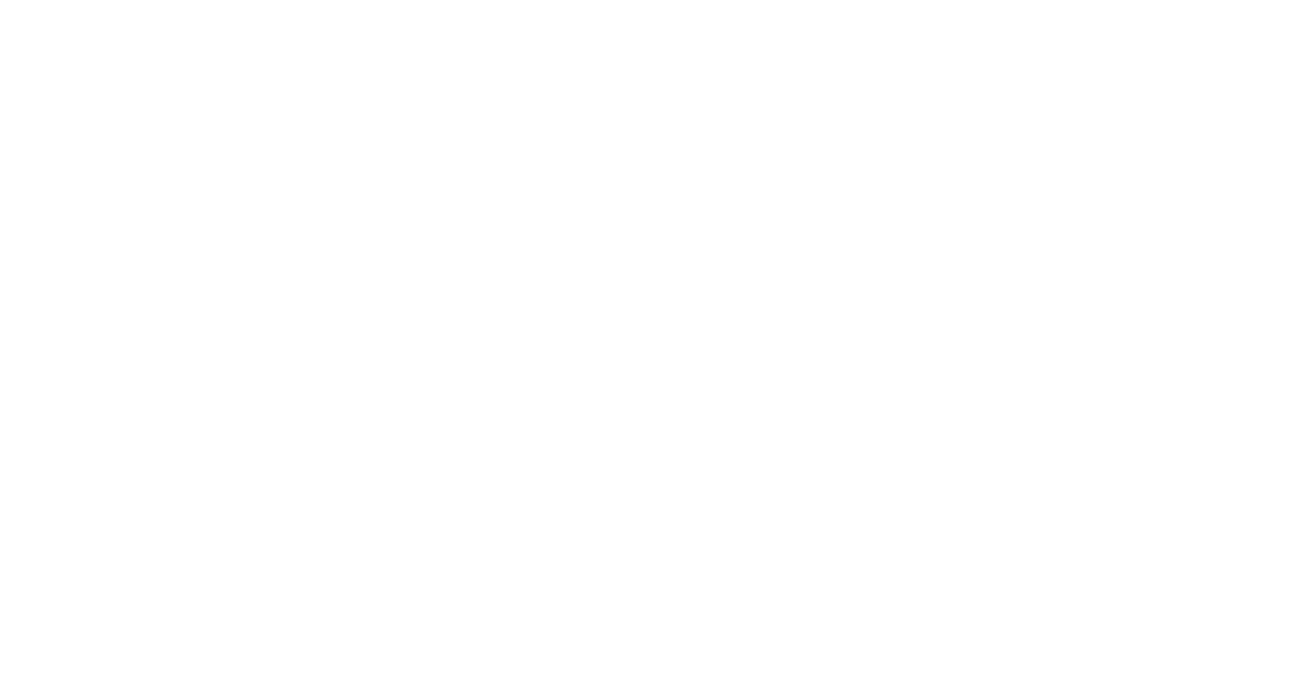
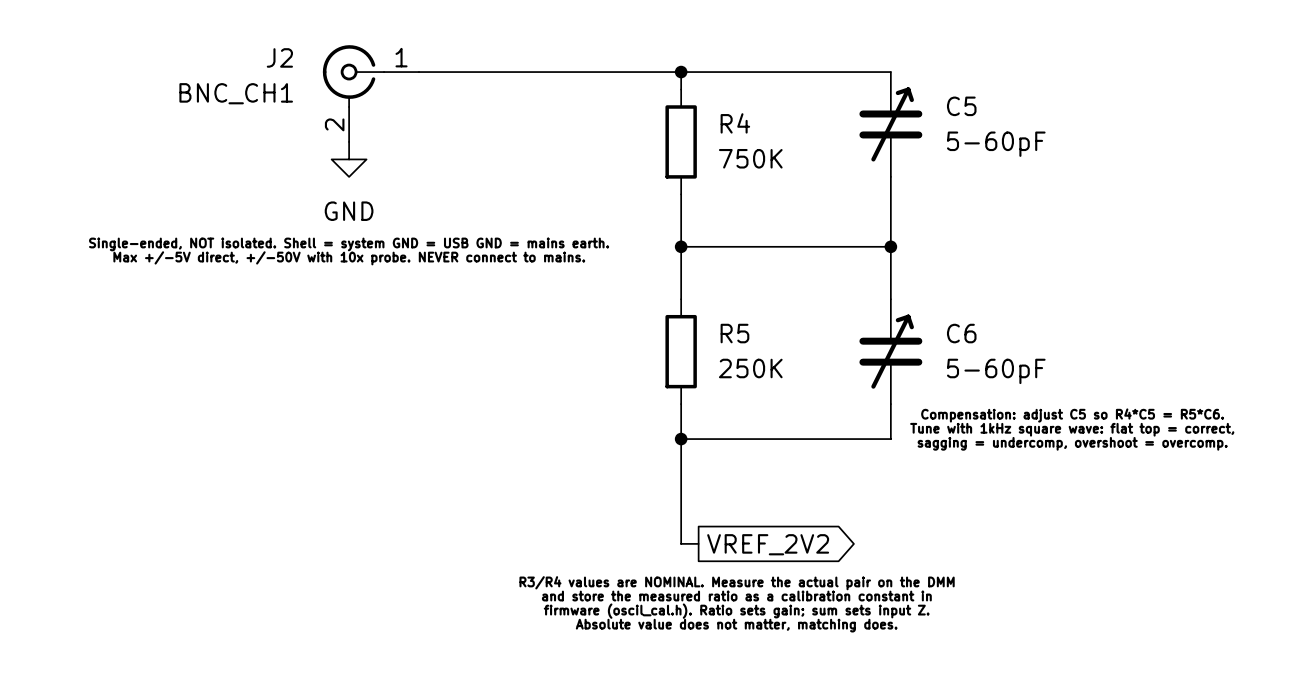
wire: none -> (419, 72) (890, 72)
wire: none -> (681, 72) (681, 89)
junction: none -> (681, 72)
J2: none -> BNC_CH1 (370, 93)
C5: none -> 5-60pF (890, 124)
R4: none -> 750K (681, 141)
power symbol: none -> GND (349, 159)
wire: none -> (890, 176) (890, 299)
wire: none -> (681, 194) (681, 299)
text: none -> Single-ended, NOT isolated. Shell = system GND = USB GND = mains earth. (349, 244)
wire: none -> (681, 246) (890, 246)
junction: none -> (681, 246)
junction: none -> (890, 246)
text: none -> Max +/-5V direct, +/-50V with 10x probe. NEVER connect to mains. (349, 258)
R5: none -> 250K (681, 351)
C6: none -> 5-60pF (890, 351)
wire: none -> (681, 404) (681, 543) (698, 543)
wire: none -> (890, 404) (890, 439) (681, 439)
text: none -> Compensation: adjust C5 so R4*C5 = R5*C6. (1072, 415)
text: none -> Tune with 1kHz square wave: flat top = correct, (1072, 429)
junction: none -> (681, 439)
text: none -> sagging = undercomp, overshoot = overcomp. (1072, 443)
global label: none -> VREF_2V2 (768, 544)
text: none -> R3/R4 values are NOMINAL. Measure the actual pair on the DMM (737, 583)
text: none -> and store the measured ratio as a calibration constant in (736, 596)
text: none -> firmware (oscil_cal.h). Ratio sets gain; sum sets input Z. (736, 611)
text: none -> Absolute value does not matter, matching does. (736, 625)

